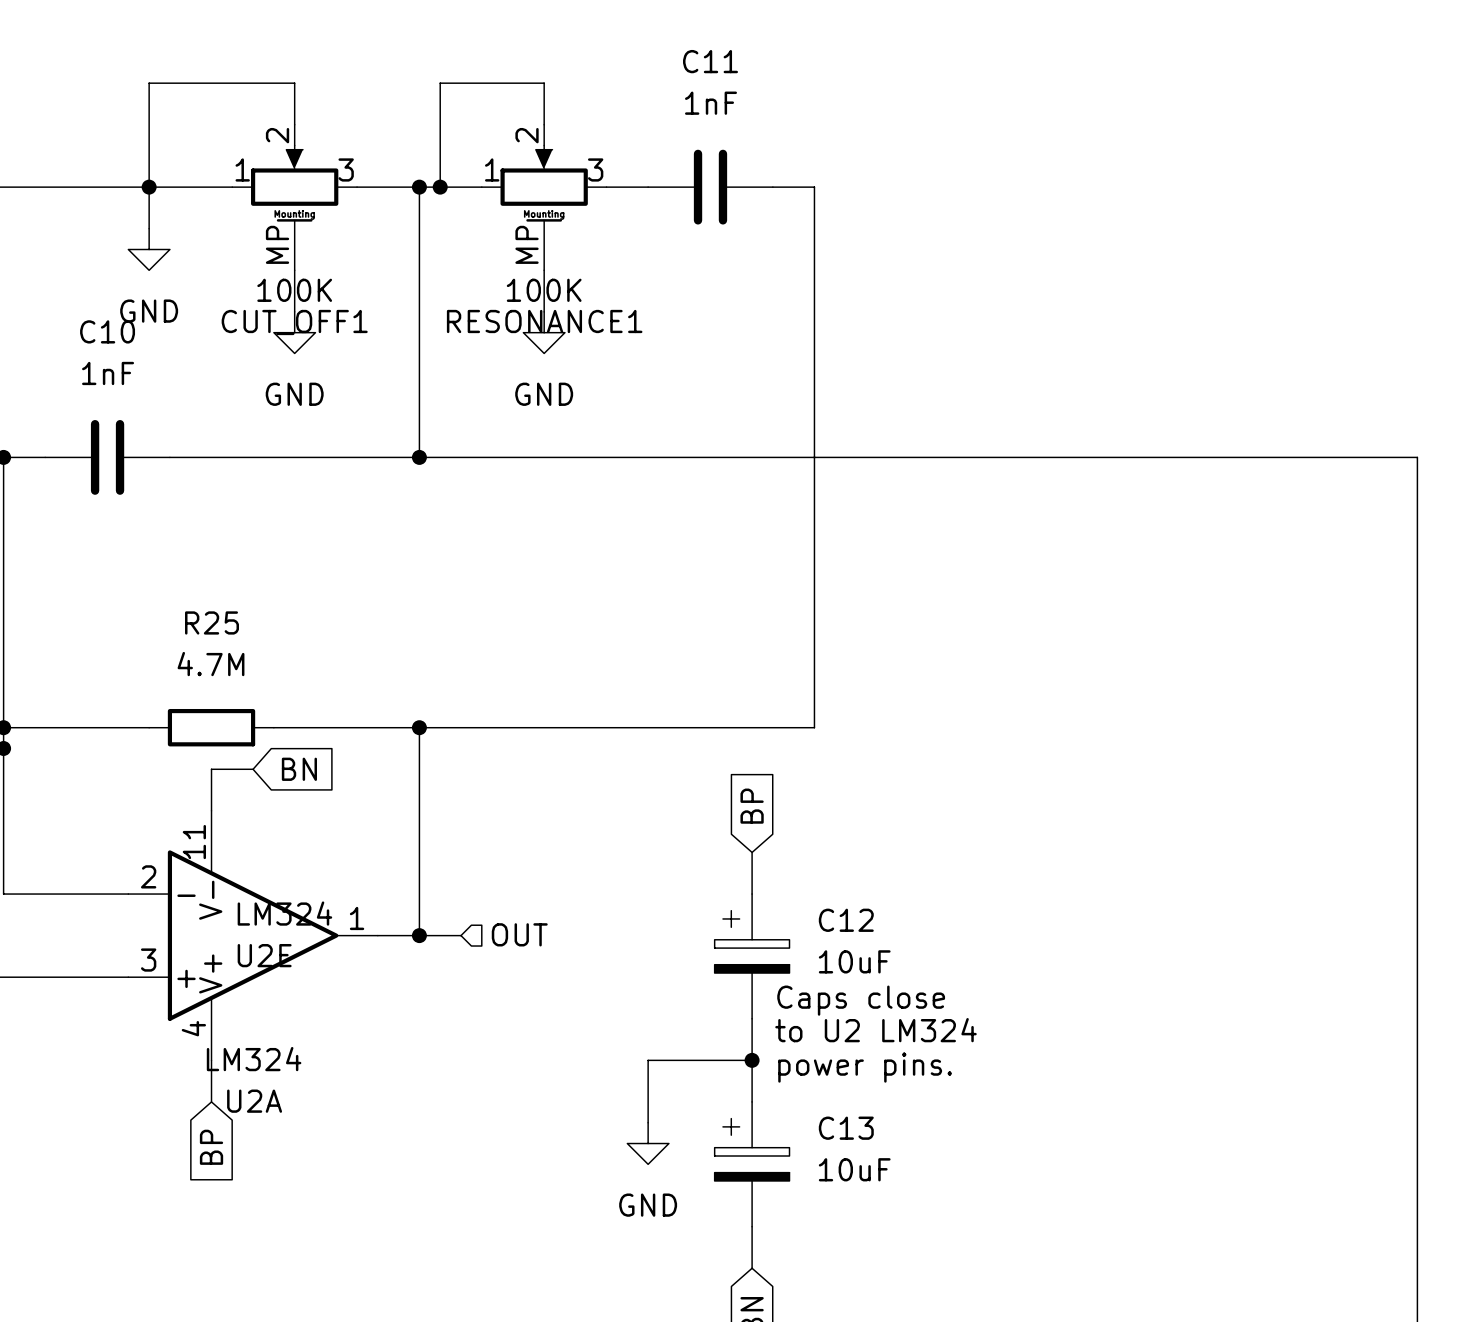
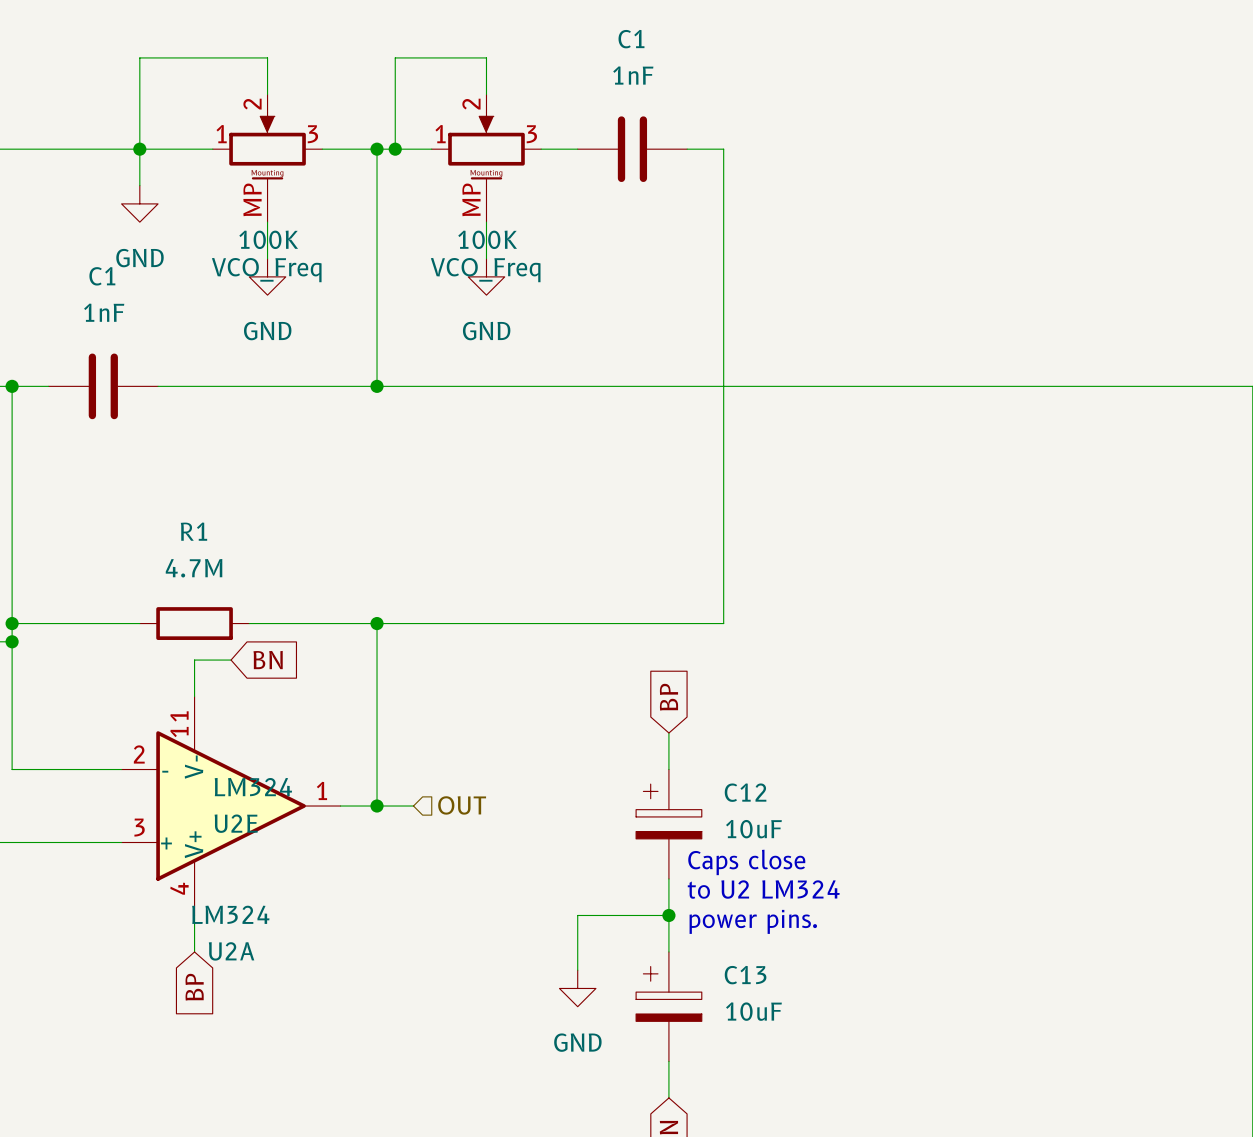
C11 name: C11 (710, 61) -> C1 (631, 39)
RESONANCE1 name: RESONANCE1 (544, 321) -> VCO_Freq (485, 270)
CUT_OFF1 name: CUT_OFF1 (294, 322) -> VCO_Freq (266, 270)
C10 name: C10 (107, 331) -> C1 (102, 276)
R25 name: R25 (212, 622) -> R1 (193, 531)

